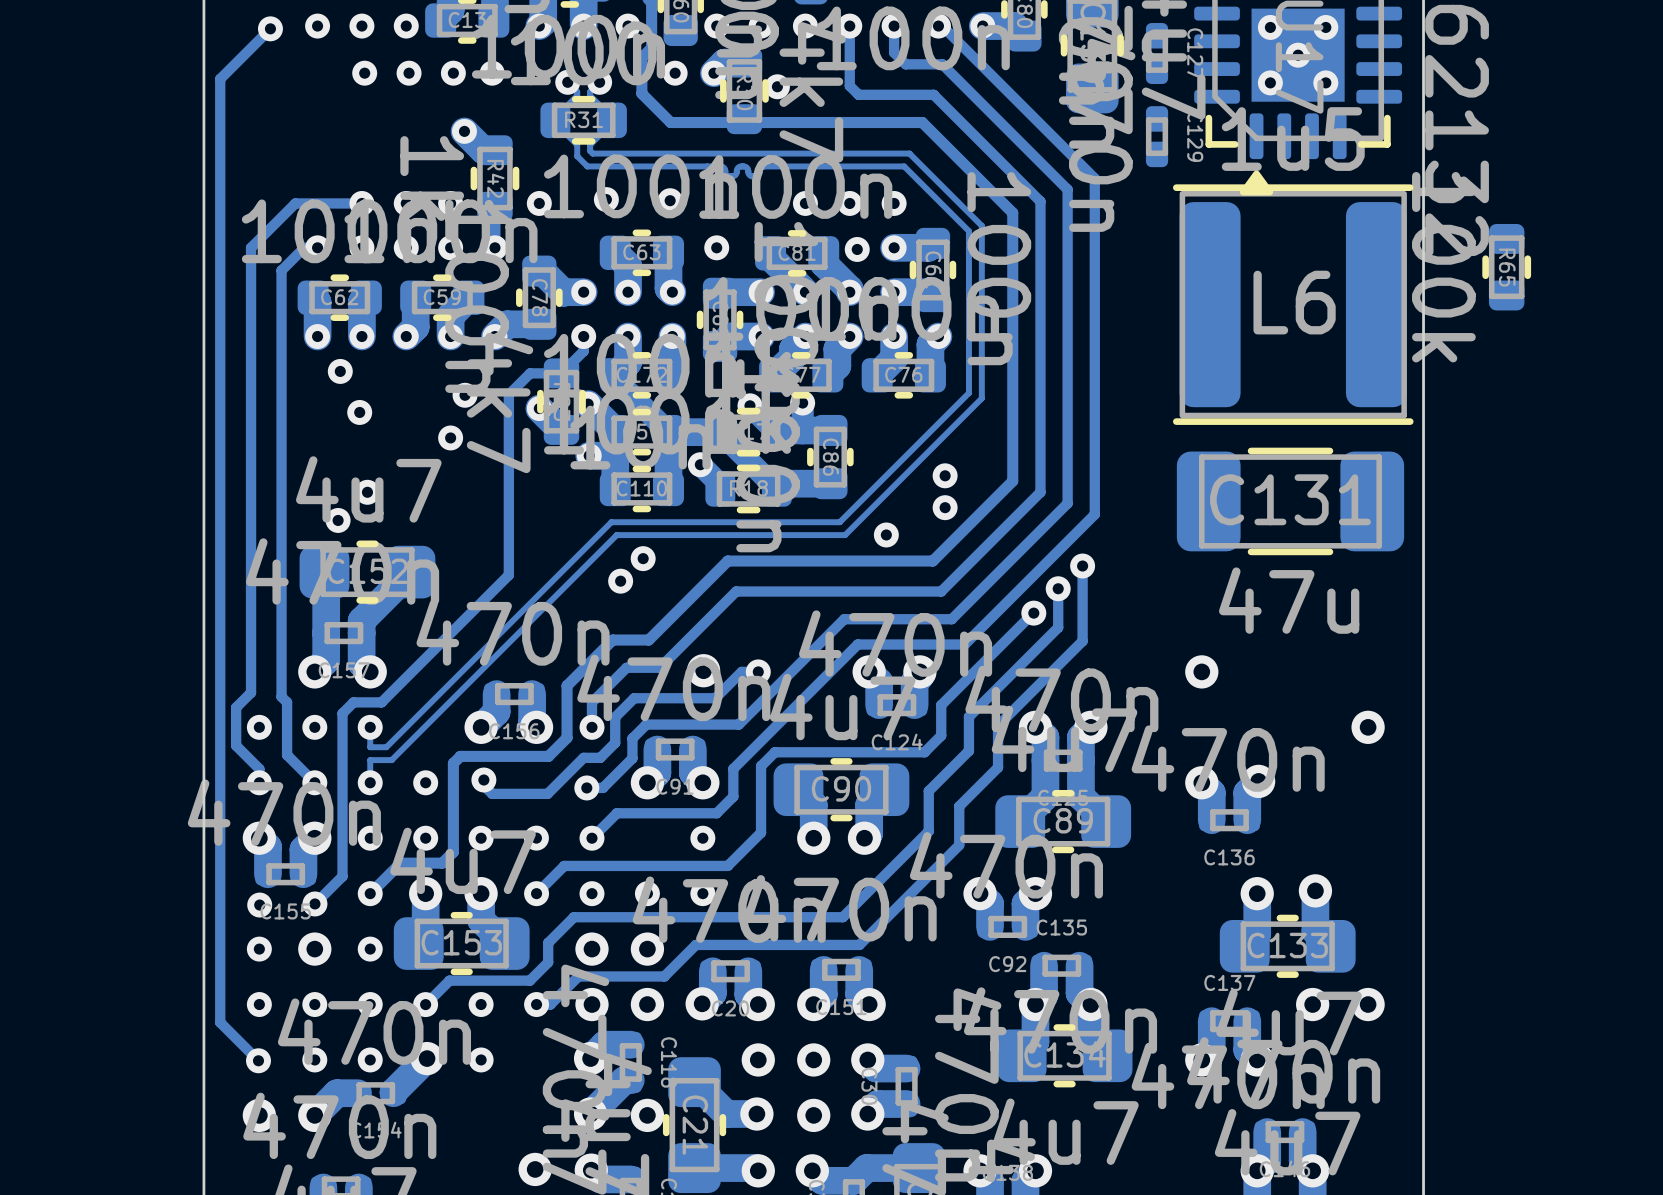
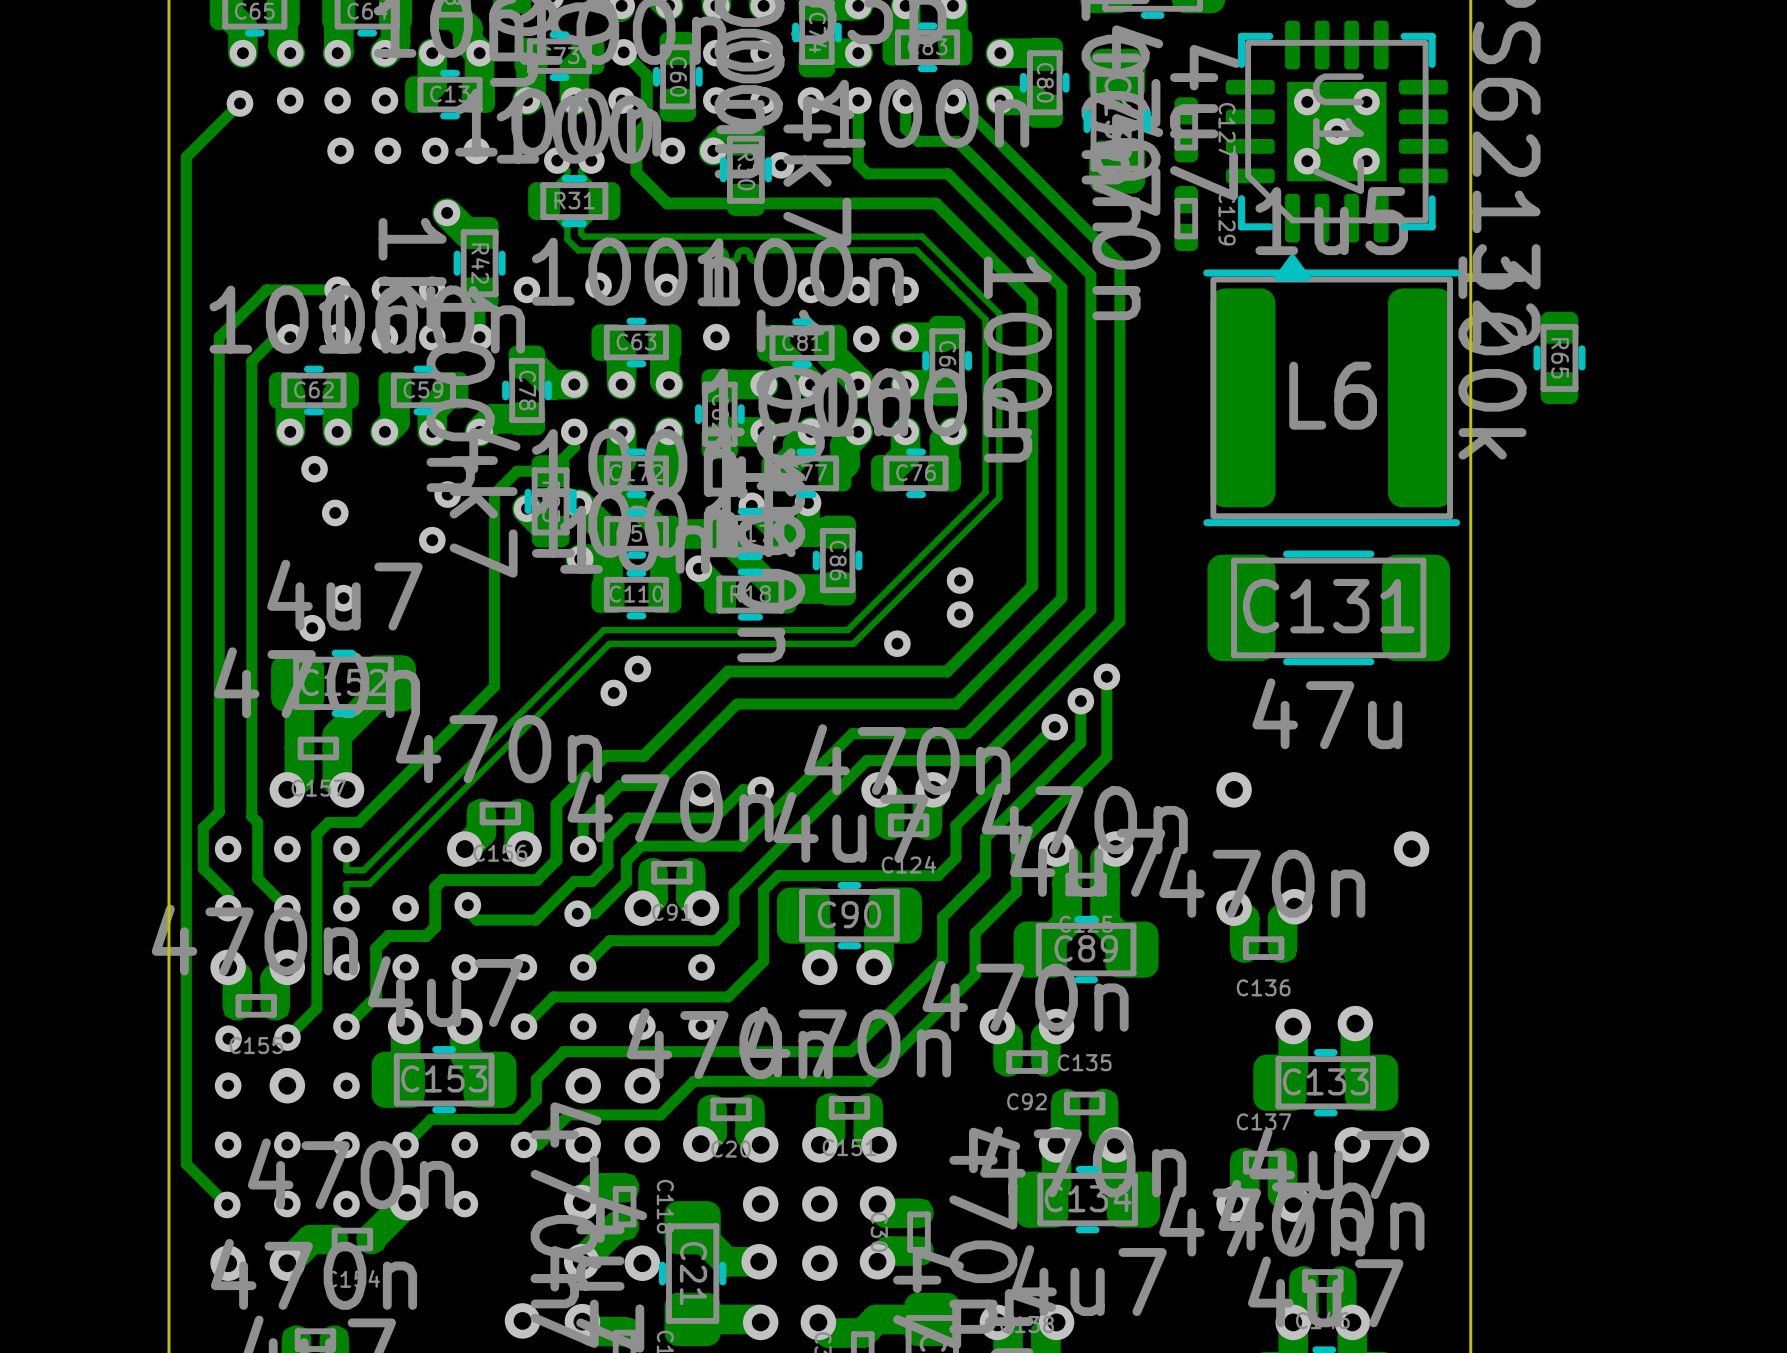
track: (453, 800) (453, 852) (442, 863) (400, 863) (397, 865) -> (435, 927) (426, 936) (388, 936) (376, 948) (376, 996)

